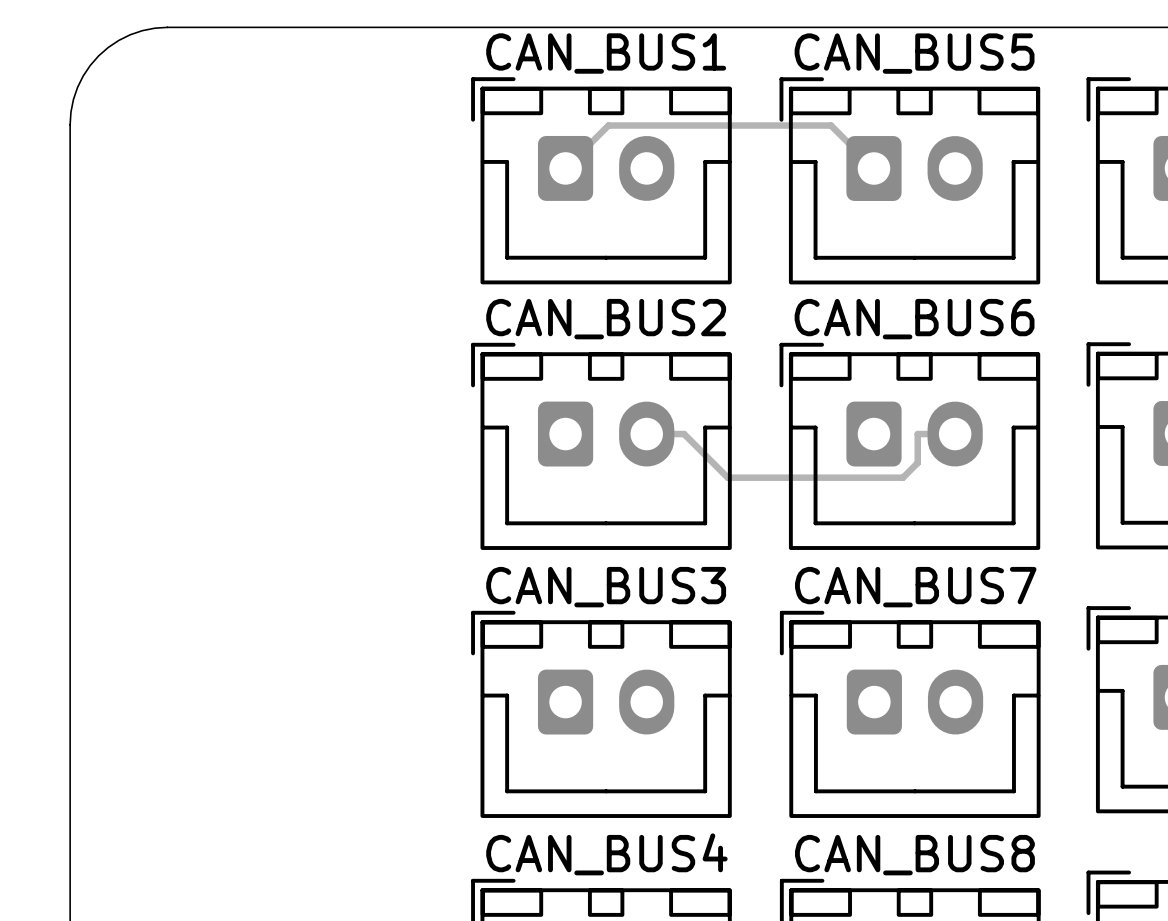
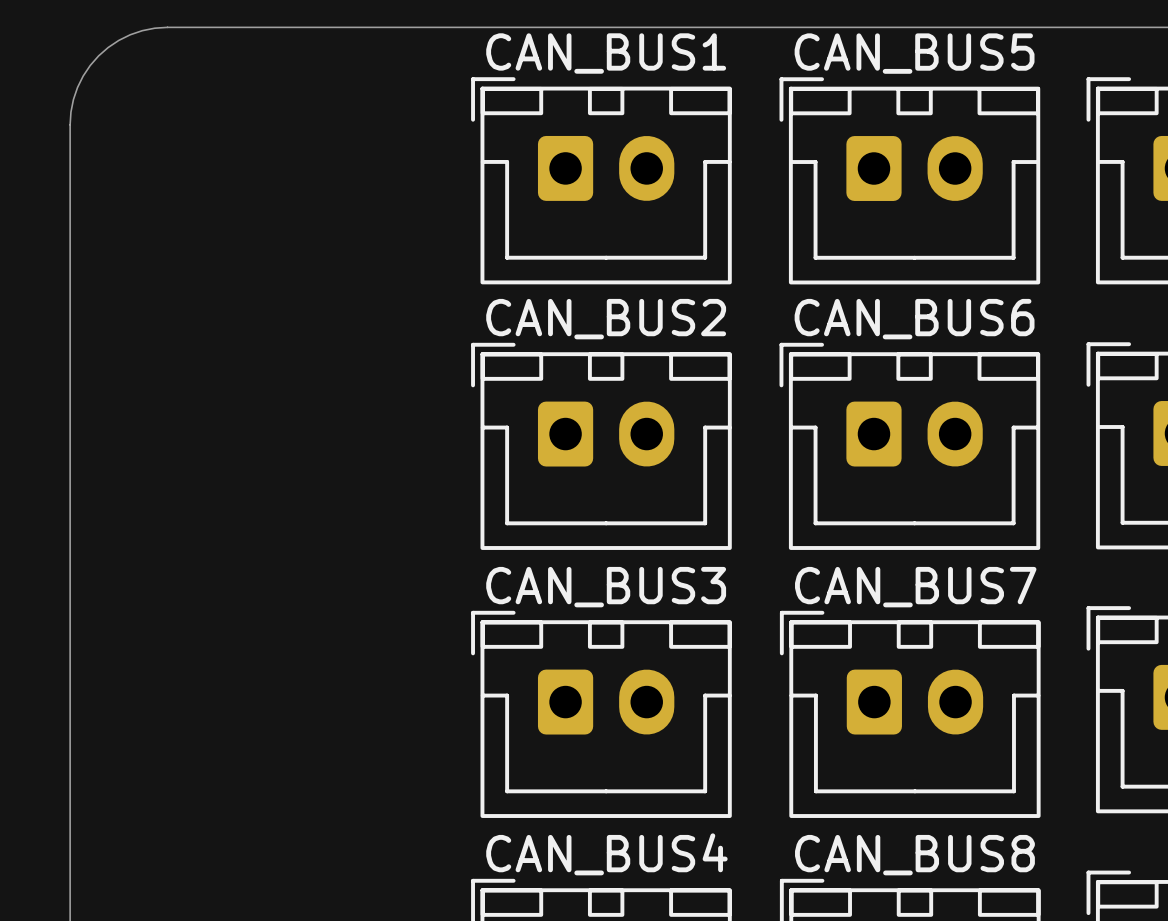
track: (565, 168) (608, 125) (831, 125) (873, 168) -> none
track: (646, 434) (684, 434) (727, 477) (903, 477) (917, 462) (917, 434) (955, 434) -> none

